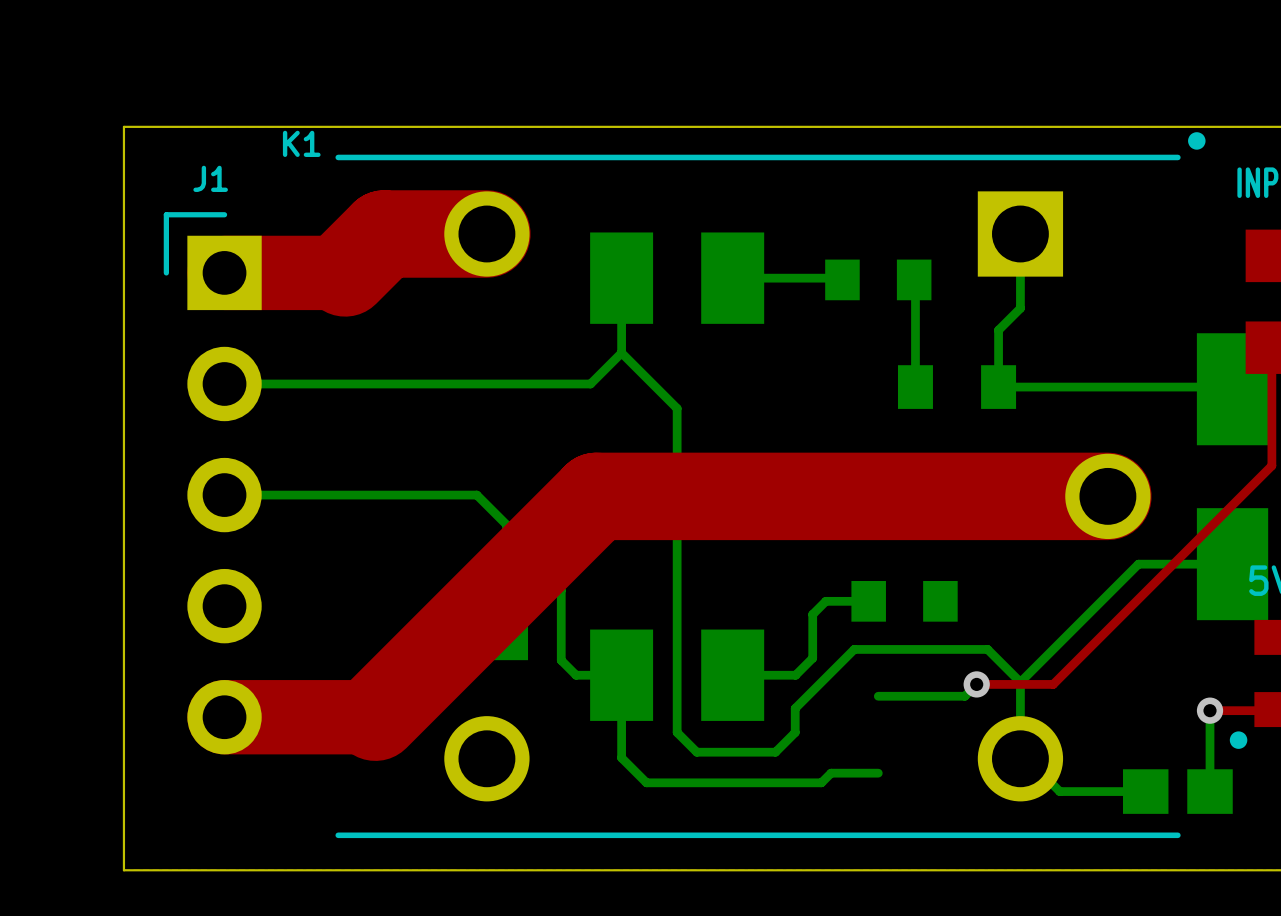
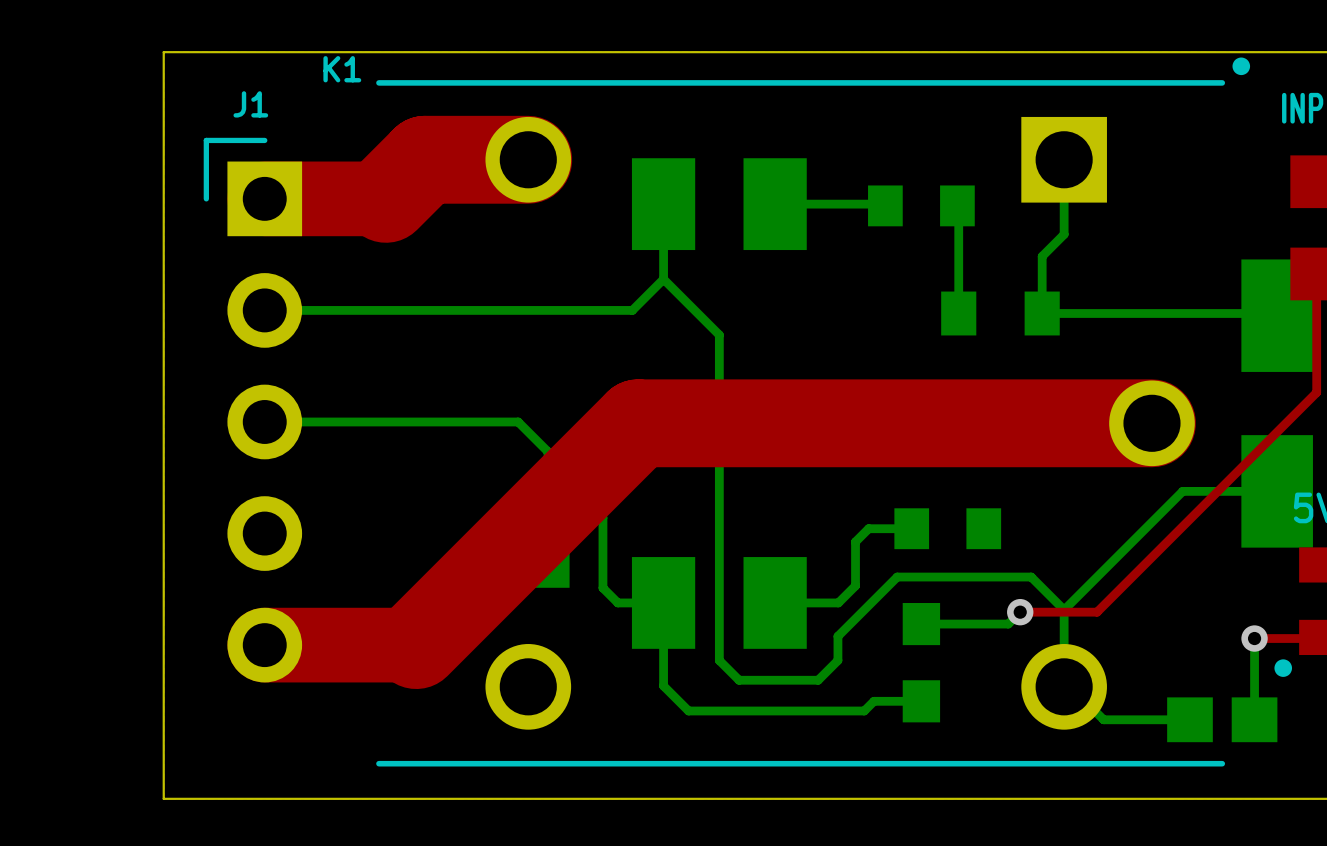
part: none -> (921, 662)

